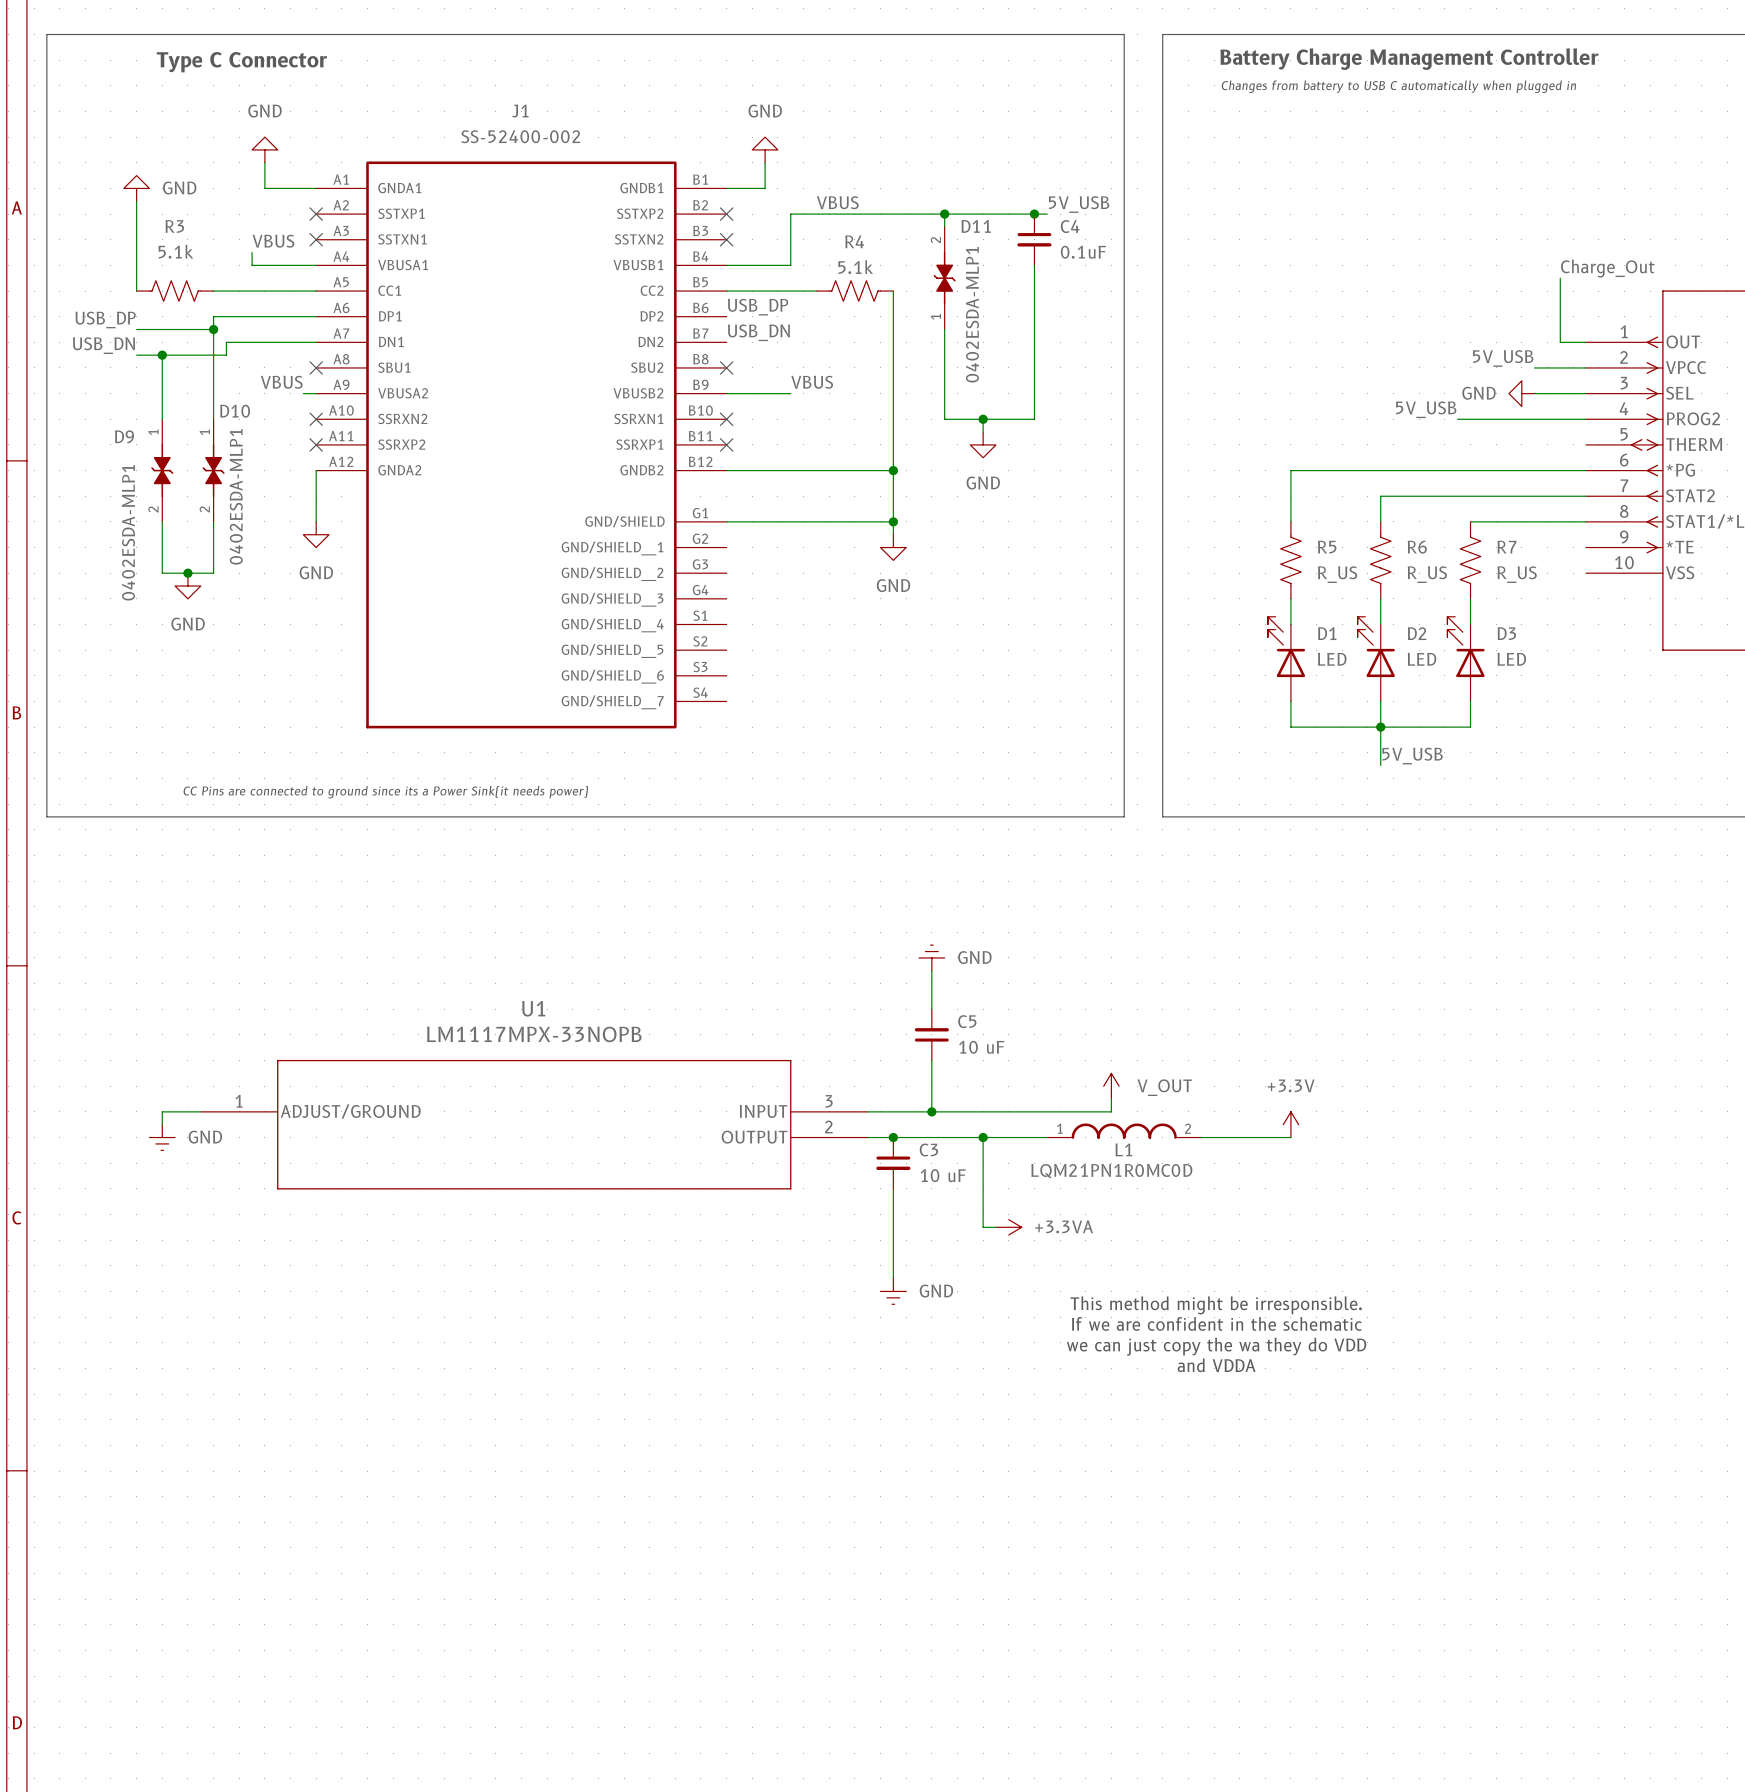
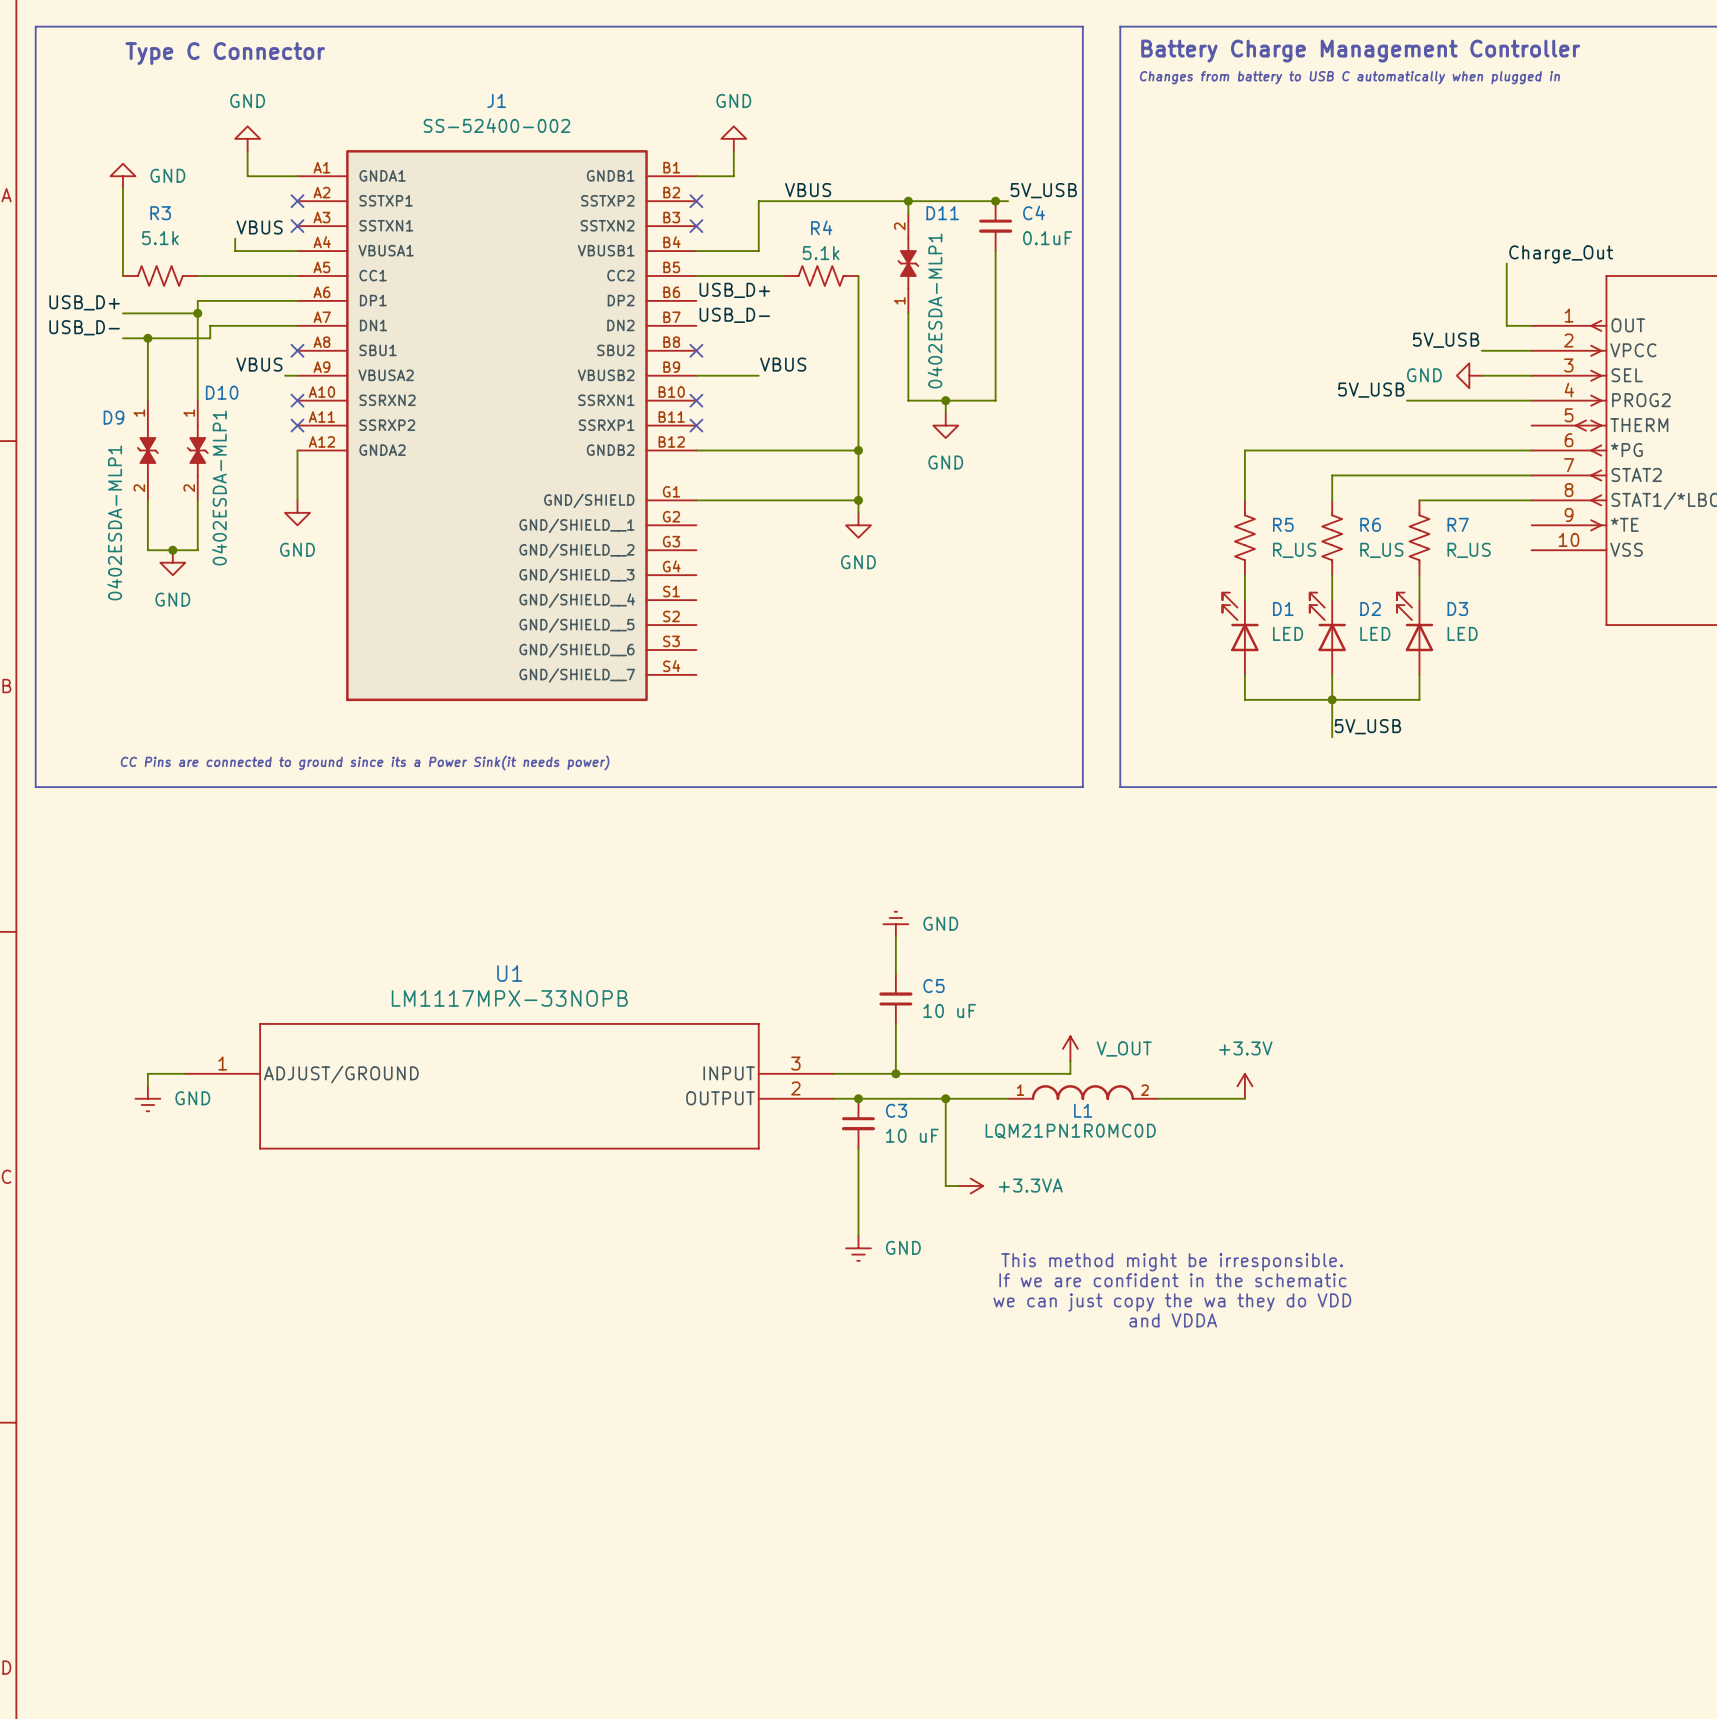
label: USB_DP (758, 307) -> USB_D+ (734, 290)
label: USB_DP (105, 319) -> USB_D+ (84, 302)
label: USB_DN (758, 332) -> USB_D- (734, 315)
label: USB_DN (103, 345) -> USB_D- (84, 327)

